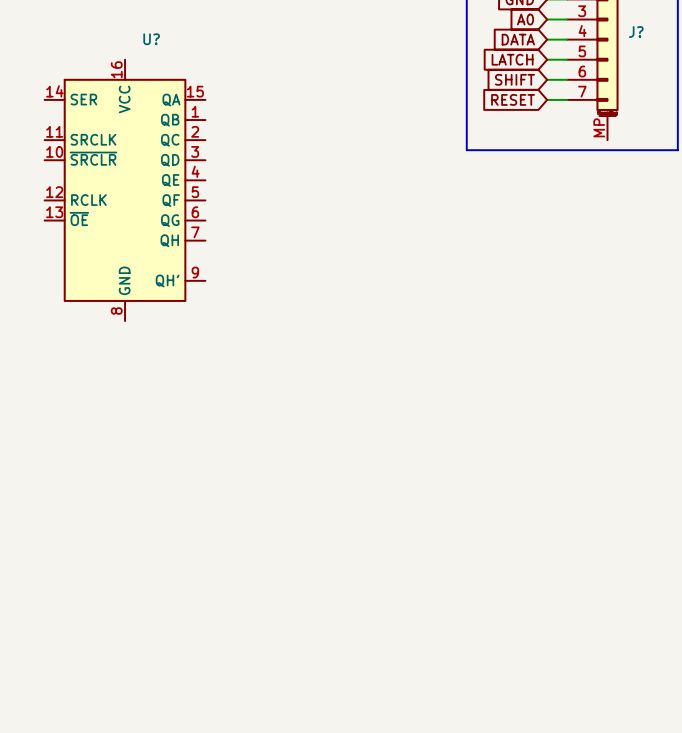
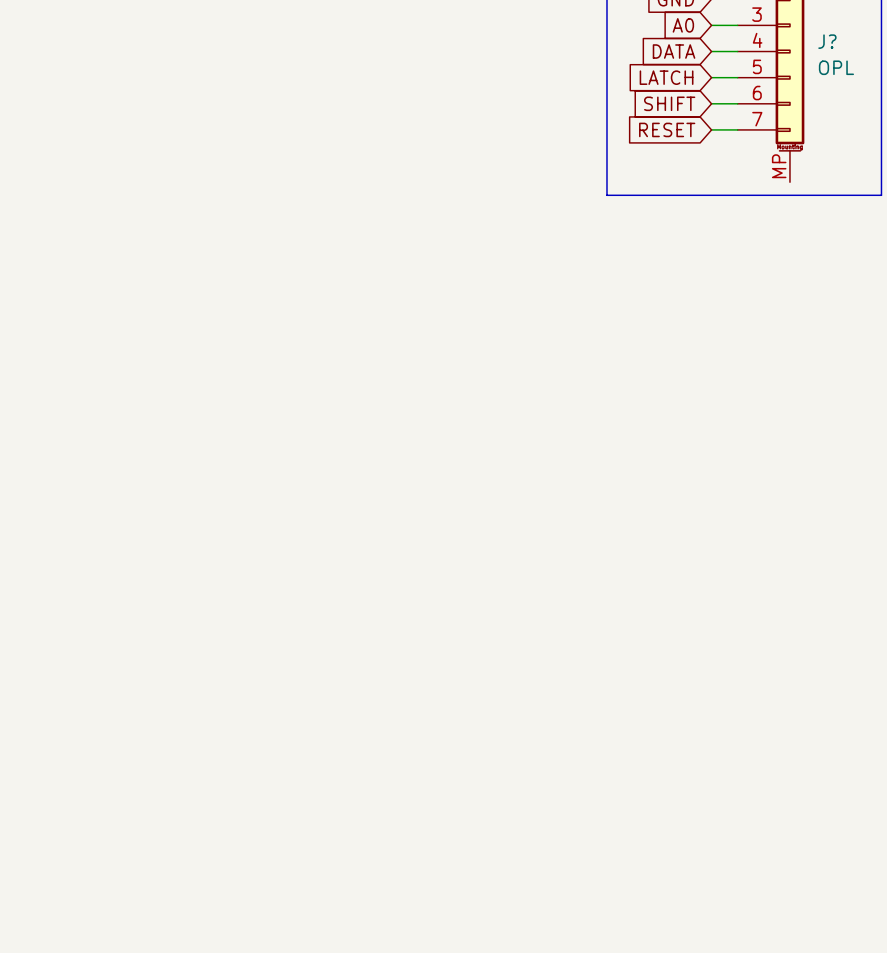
J? value: none -> OPL (836, 67)
U?: (125, 190) -> none

